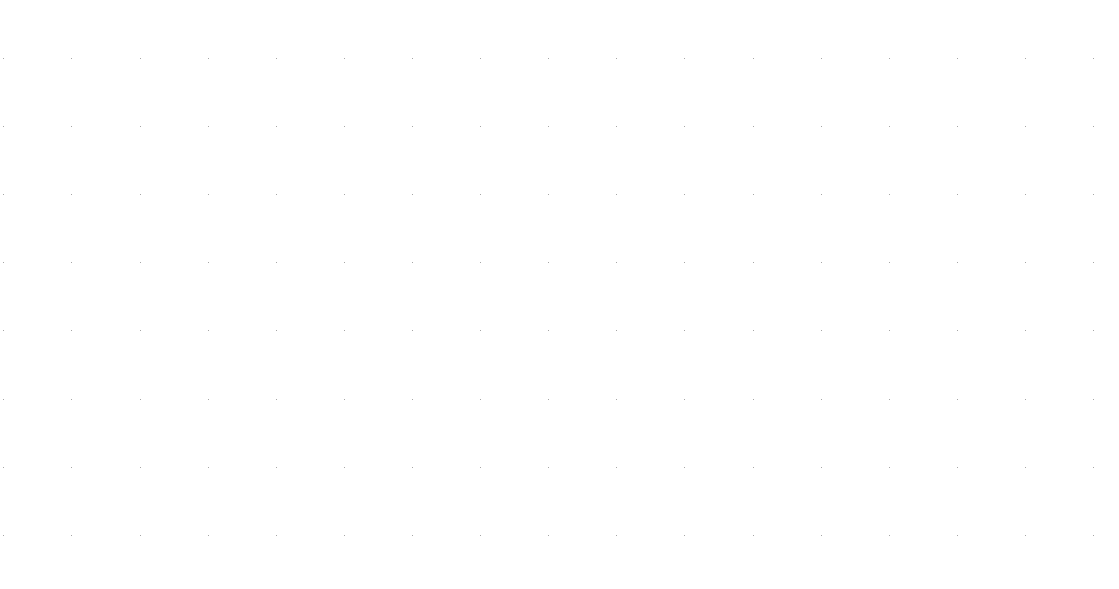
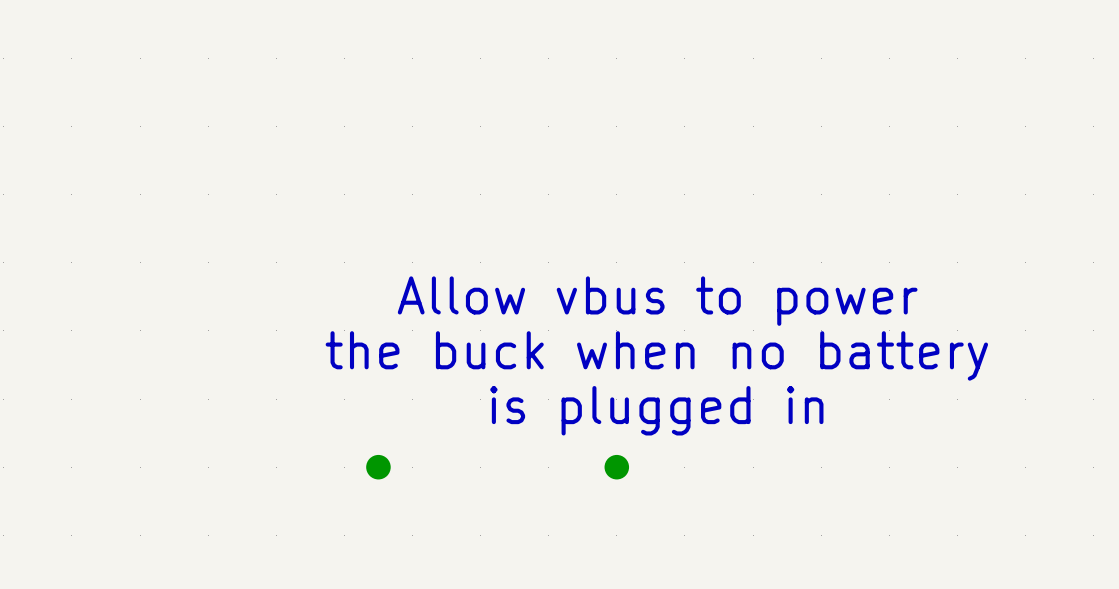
text: none -> Allow vbus to power (657, 301)
text: none -> the buck when no battery (656, 355)
text: none -> is plugged in (656, 410)
junction: none -> (378, 467)
junction: none -> (616, 467)

